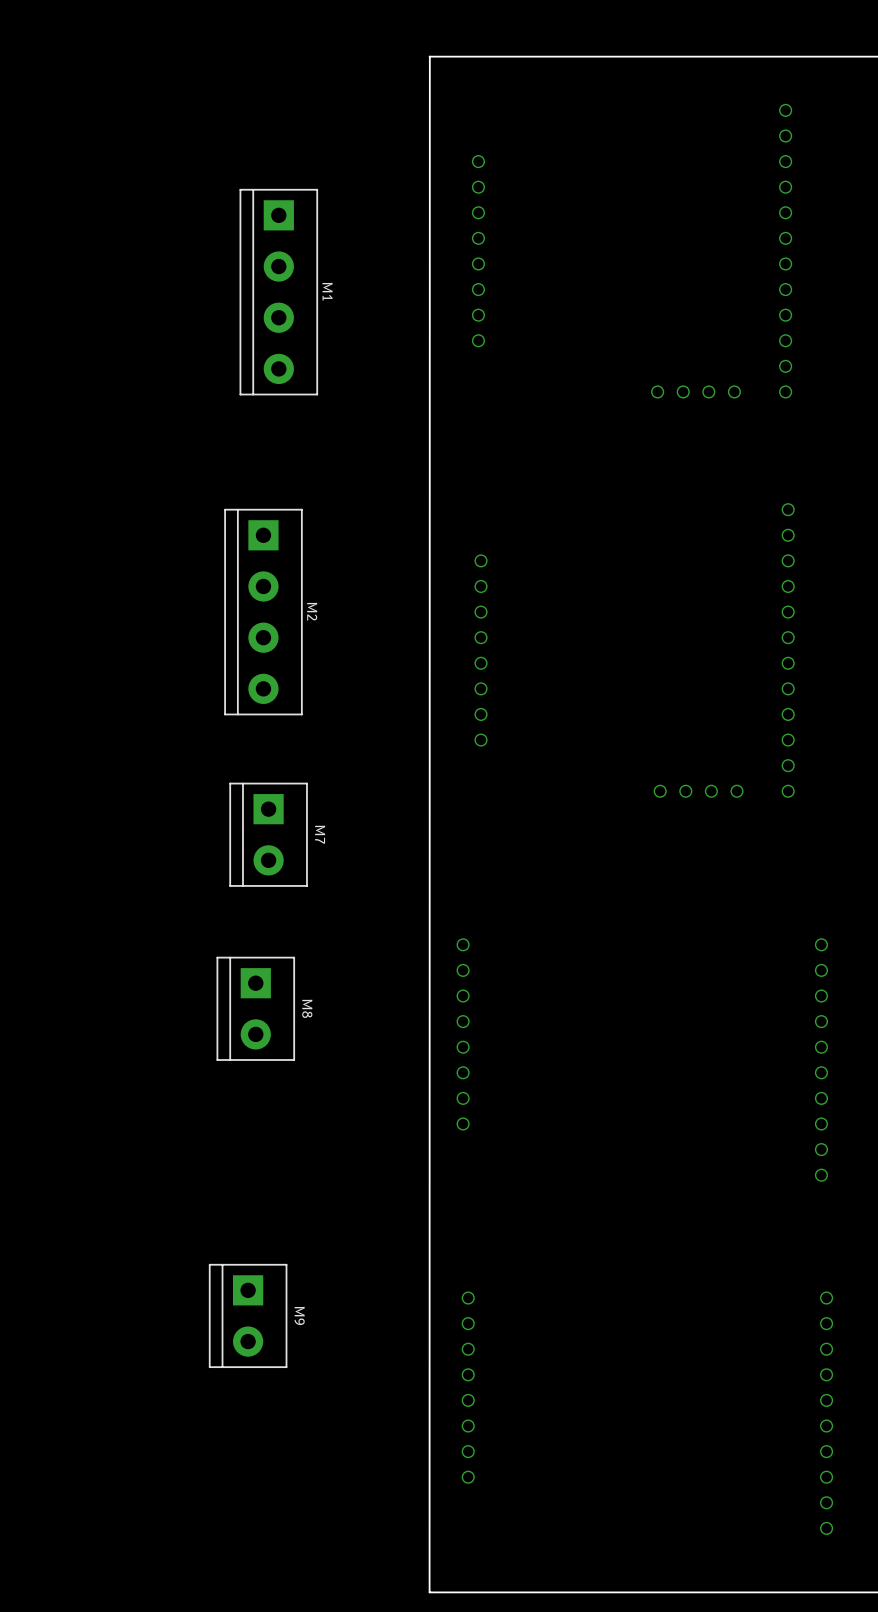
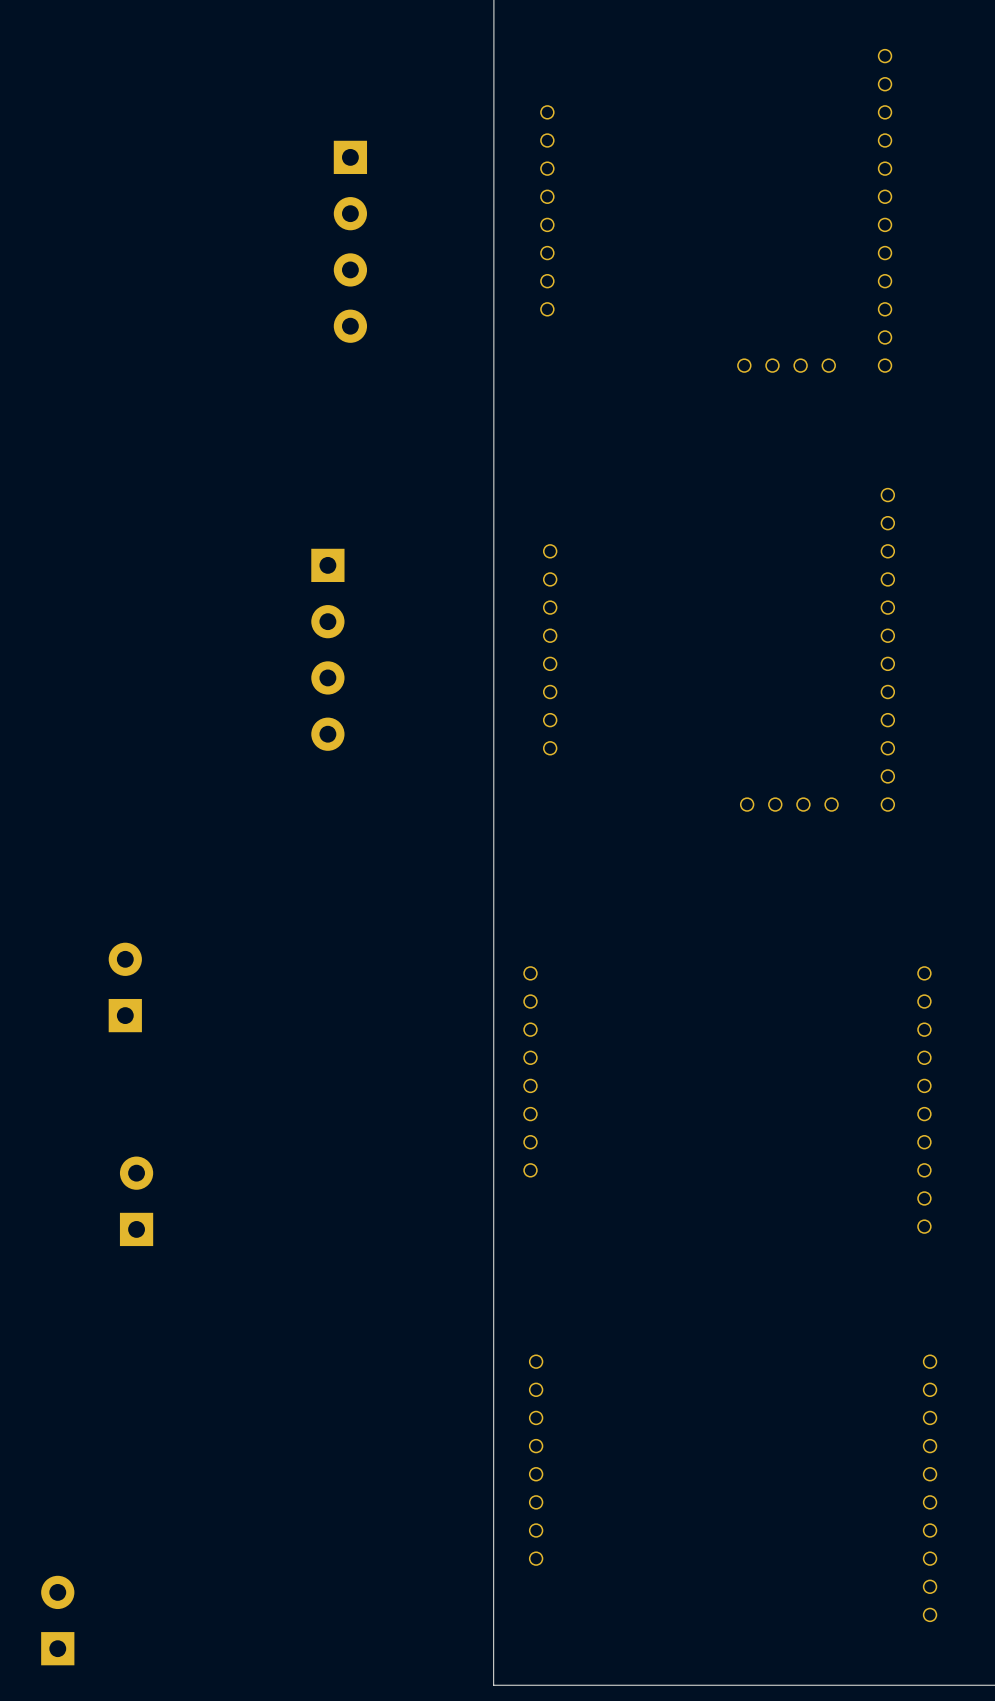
M1 side: bottom (278, 292) -> top (350, 241)
M2 side: bottom (263, 612) -> top (327, 649)
M7: (268, 834) -> none
M8 side: bottom (255, 1008) -> top (125, 987)
M9 side: bottom (248, 1315) -> top (136, 1201)
part: none -> (57, 1620)

